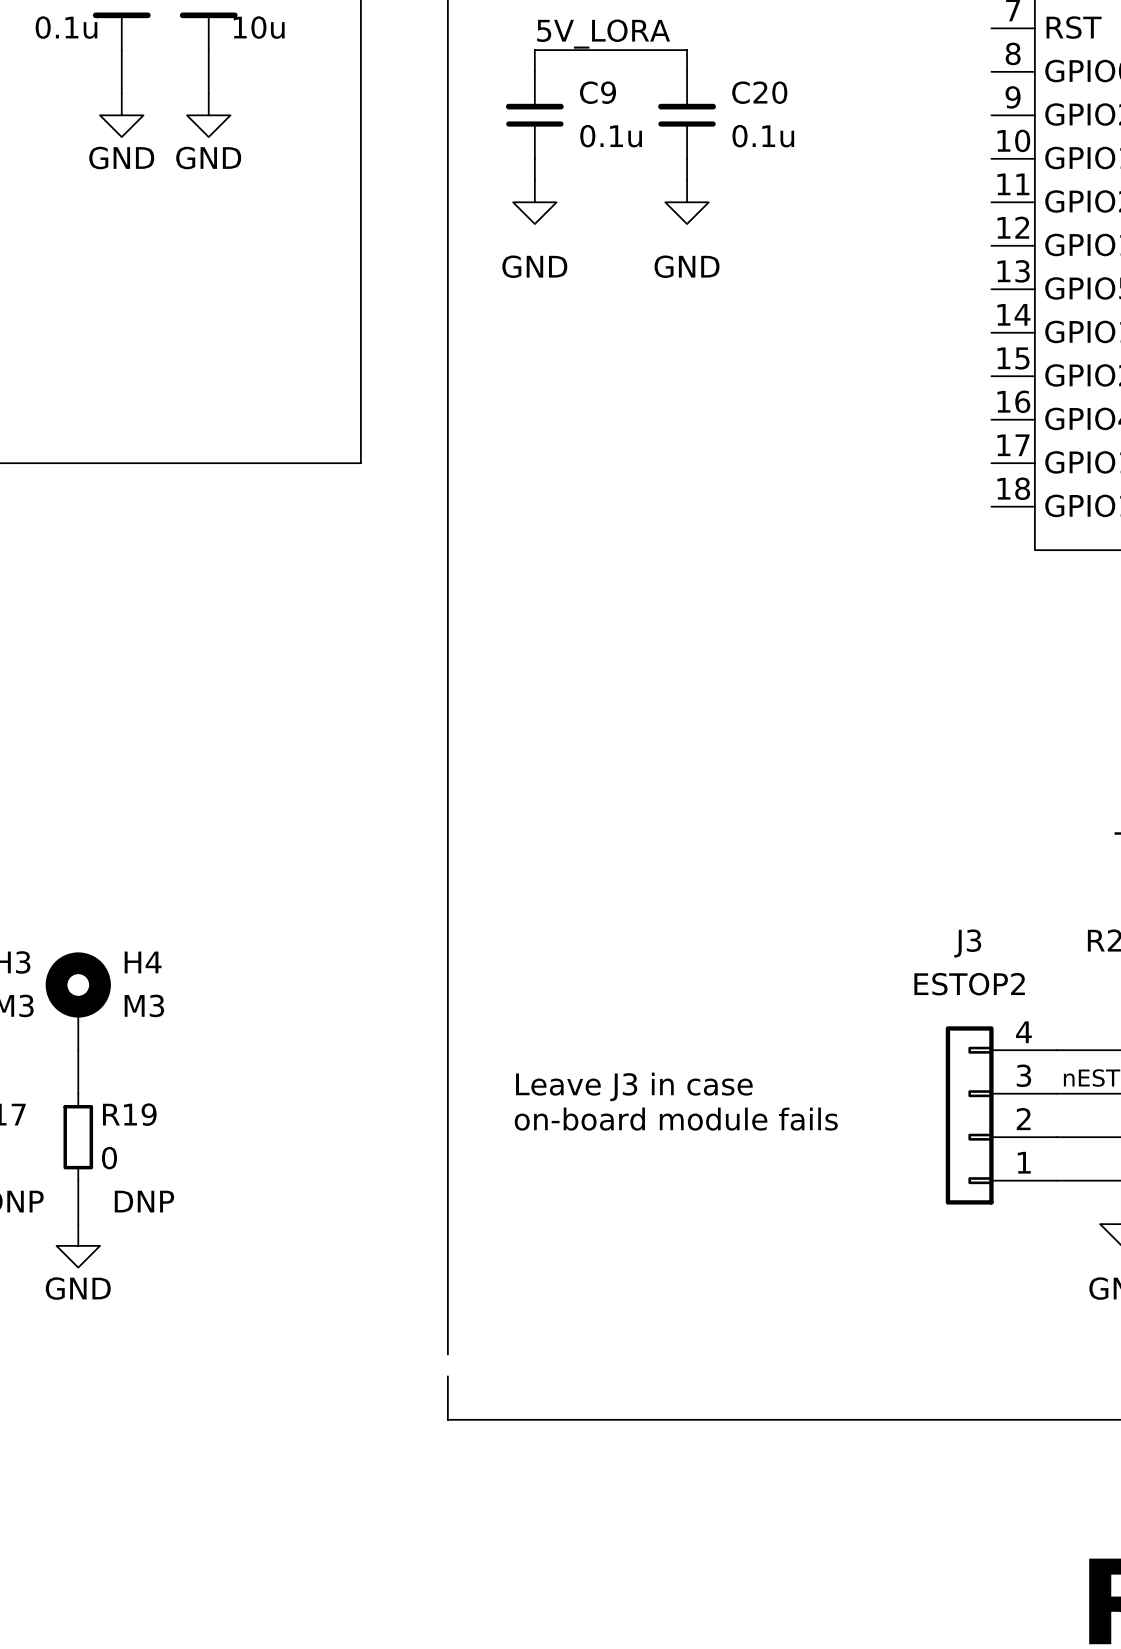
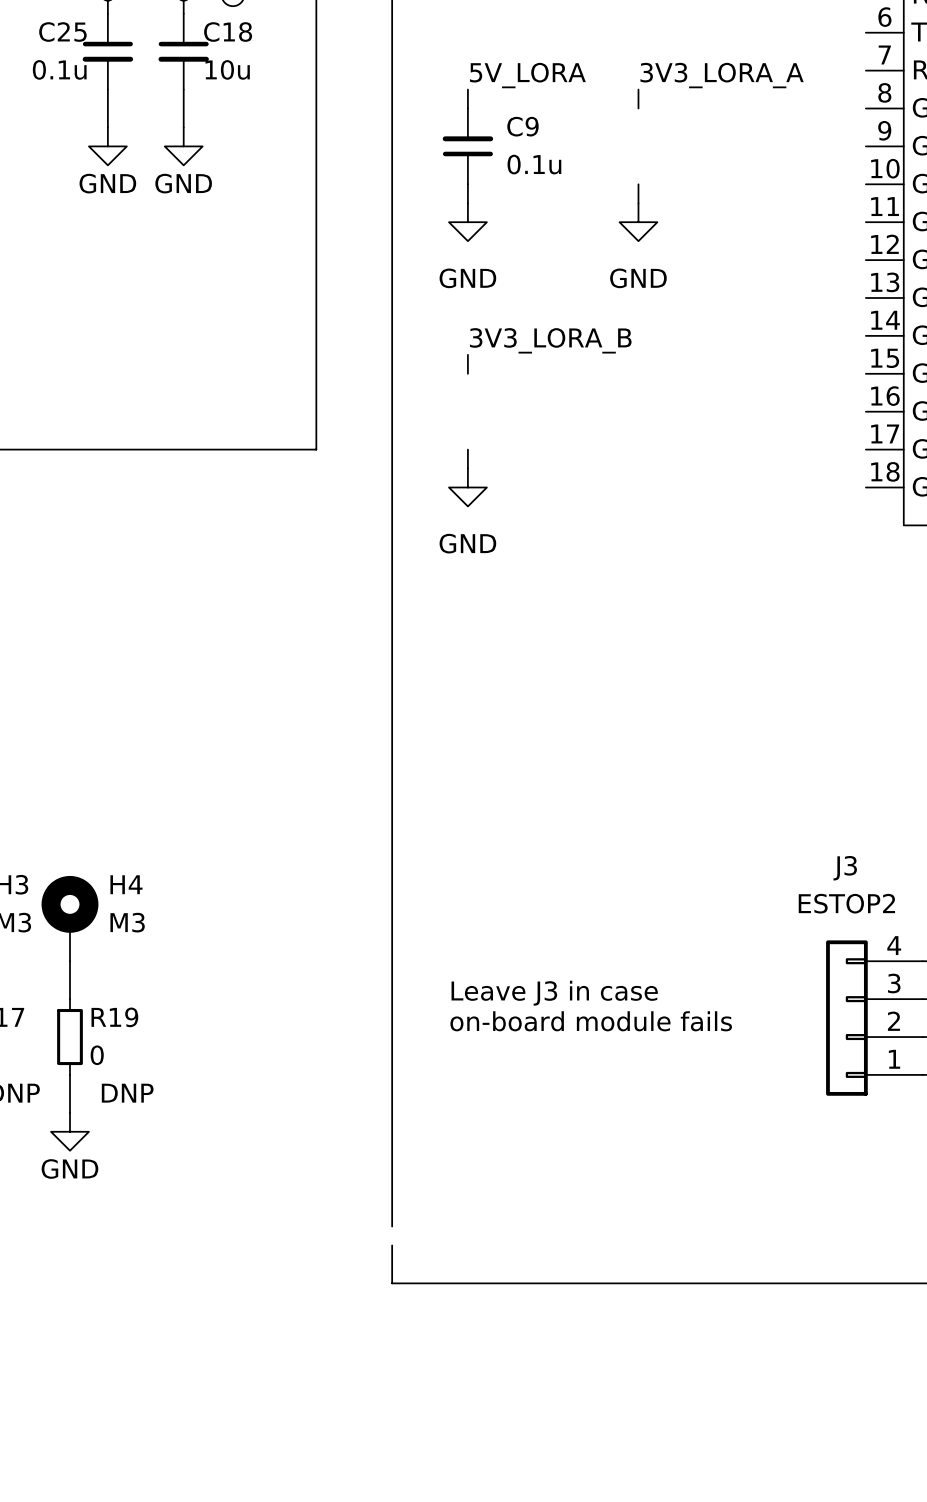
label: none -> 3V3_LORA_A (722, 75)
wire: (534, 50) (687, 50) (687, 71) -> none
wire: none -> (638, 89) (638, 108)
C20: 0.1u (687, 115) -> none
wire: (687, 158) (687, 180) -> (638, 184) (638, 203)
power symbol position: GND (687, 202) -> GND (638, 222)
label: none -> 3V3_LORA_B (550, 340)
wire: none -> (467, 354) (467, 373)
wire: none -> (467, 449) (467, 468)
power symbol: none -> GND (467, 487)

